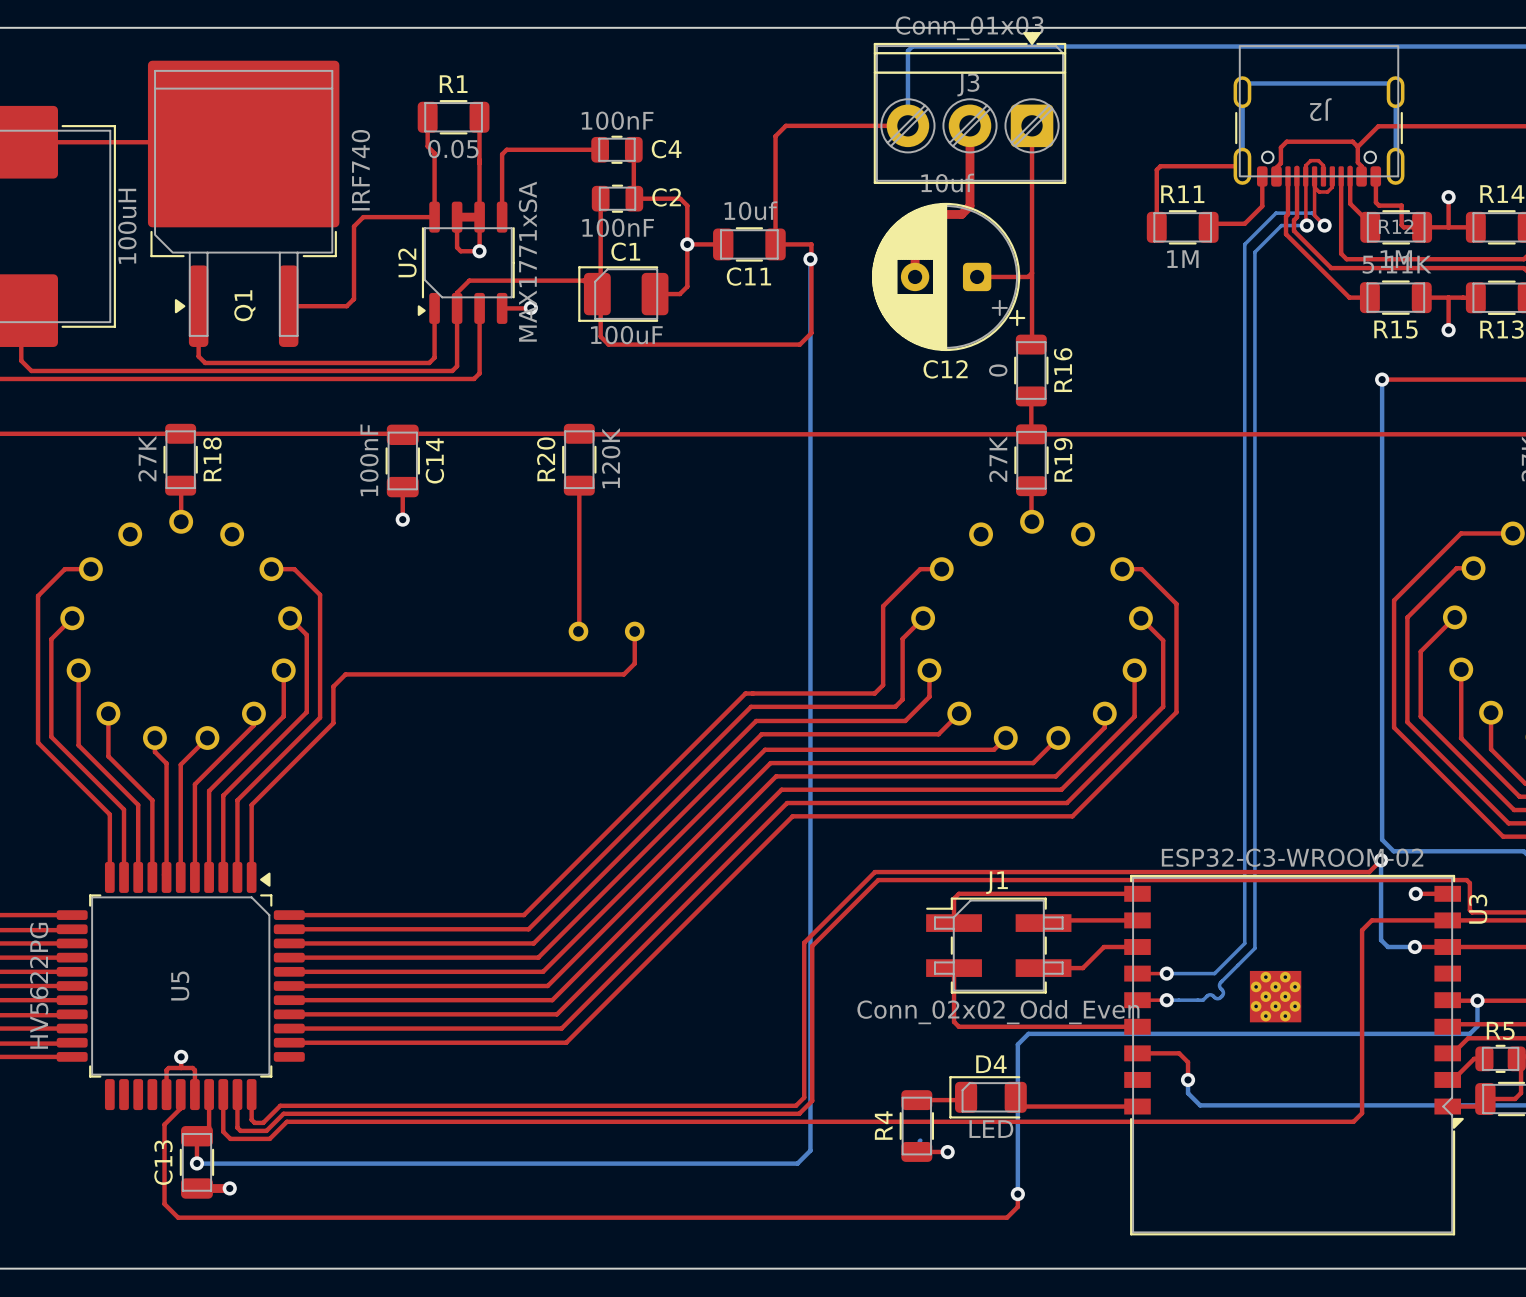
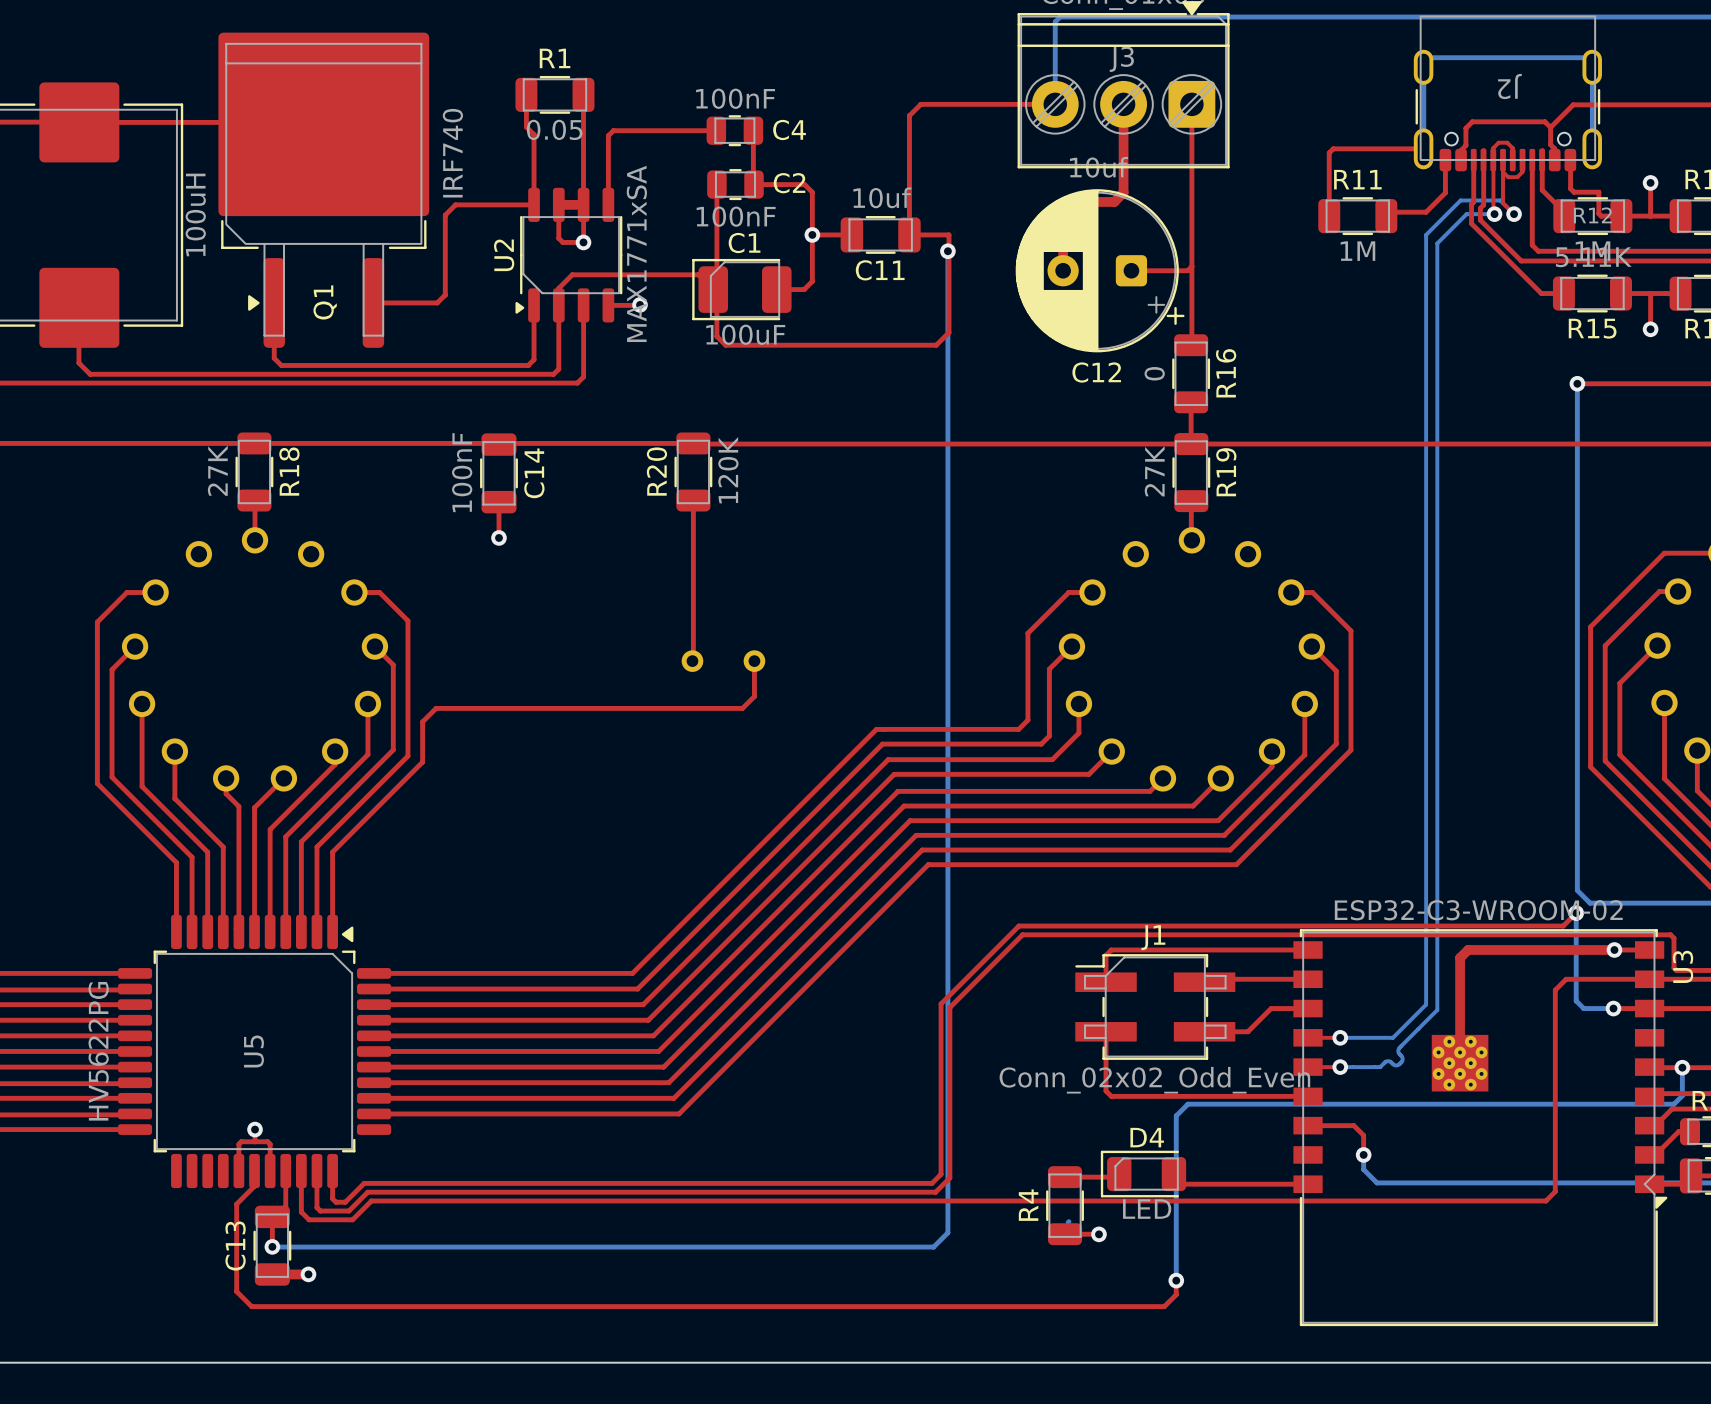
top track: none -> (1614, 949) (1468, 949) (1460, 957) (1460, 1063)

